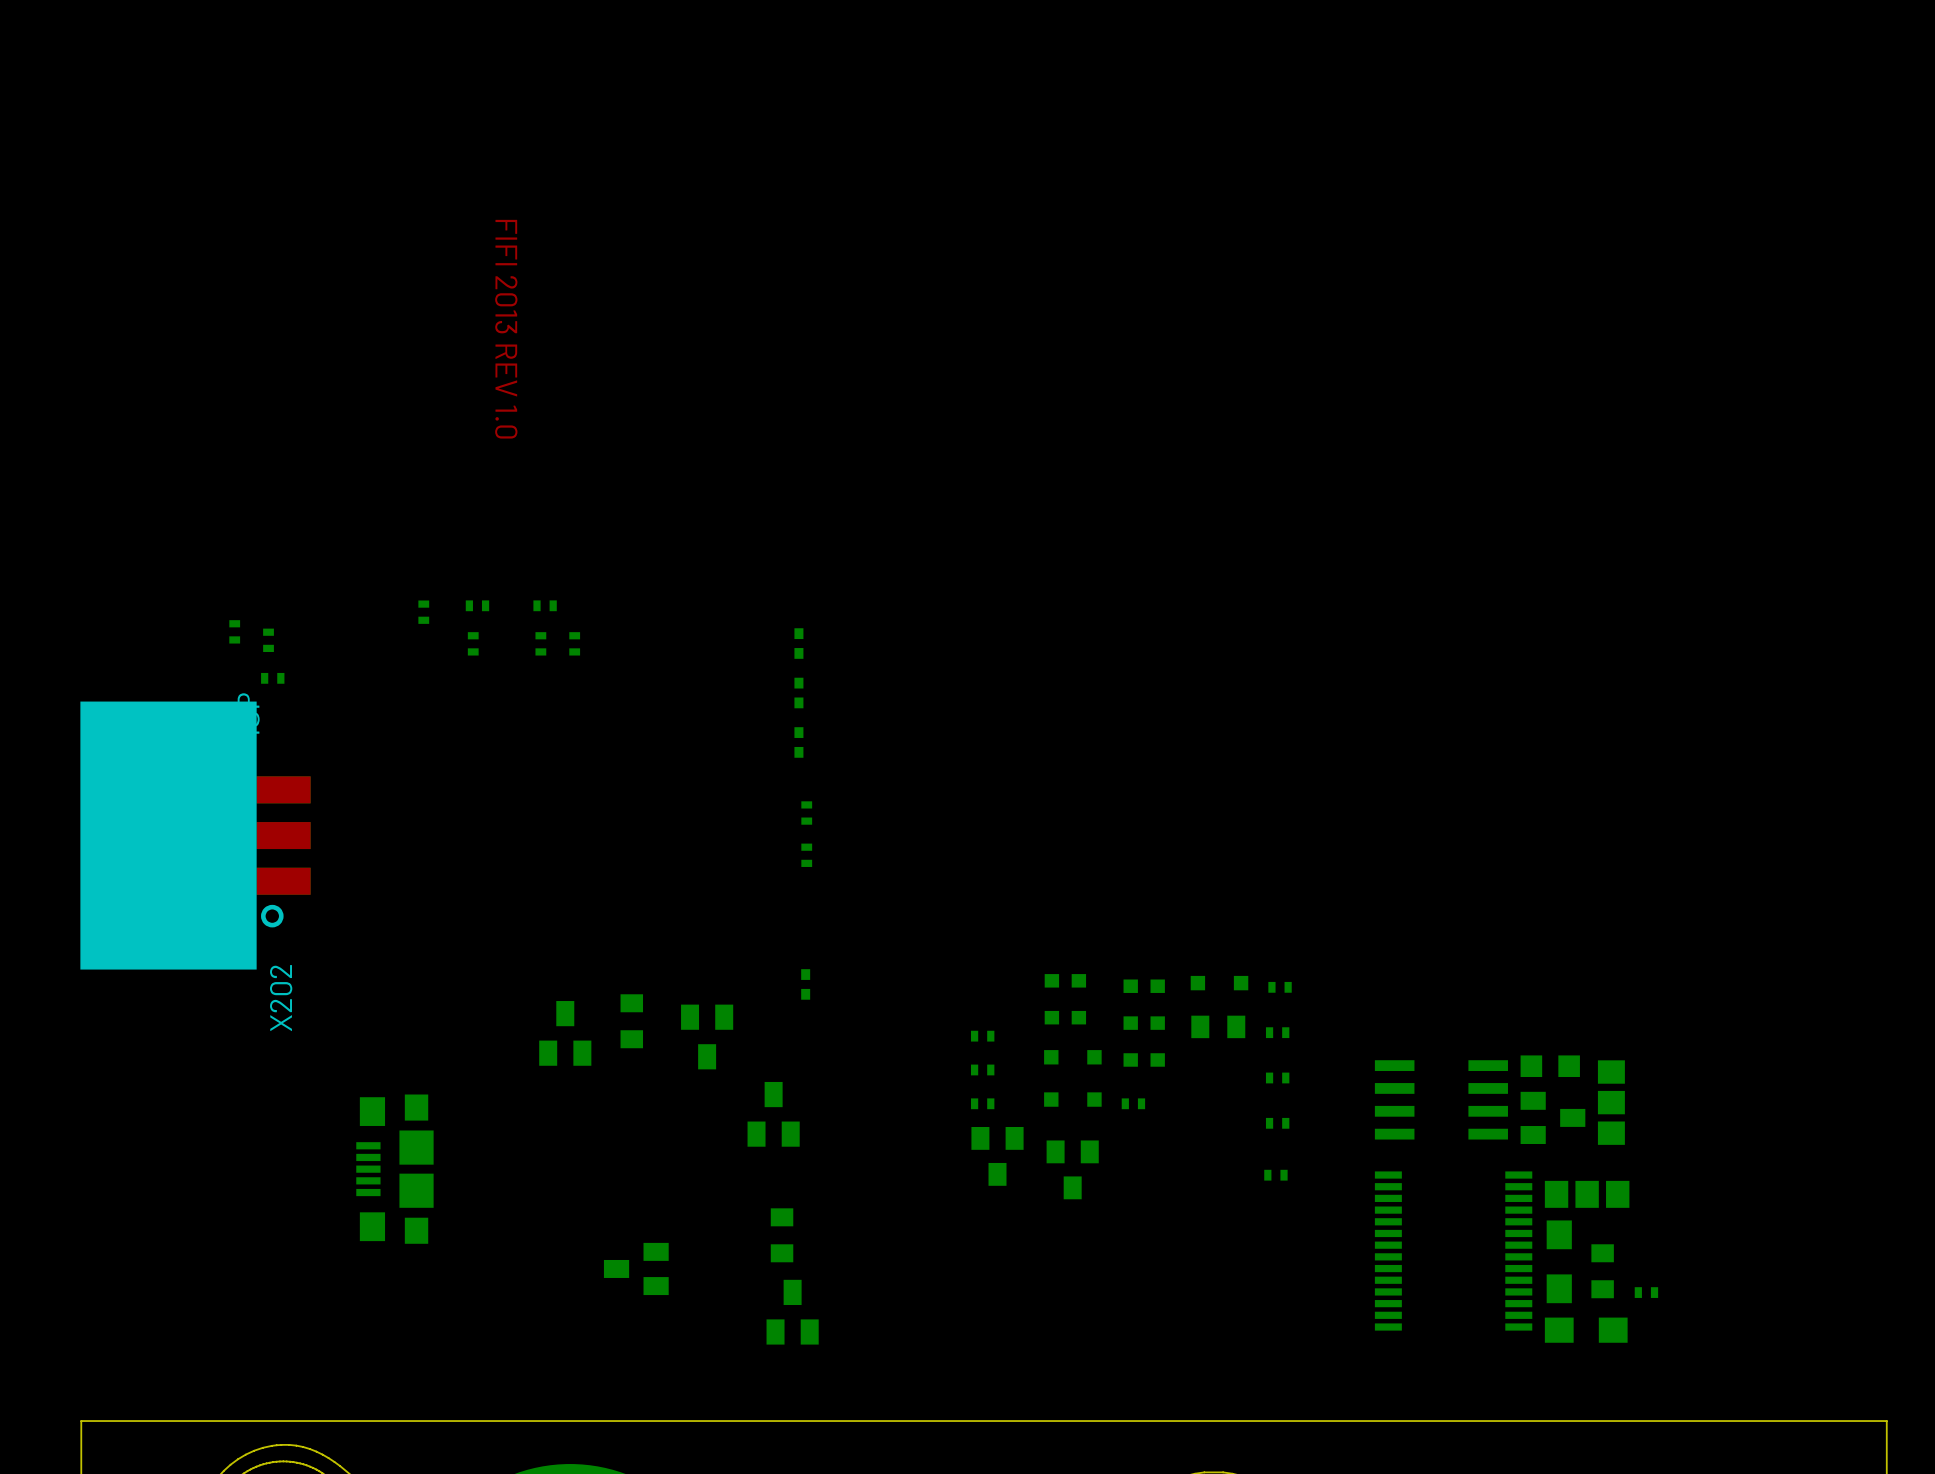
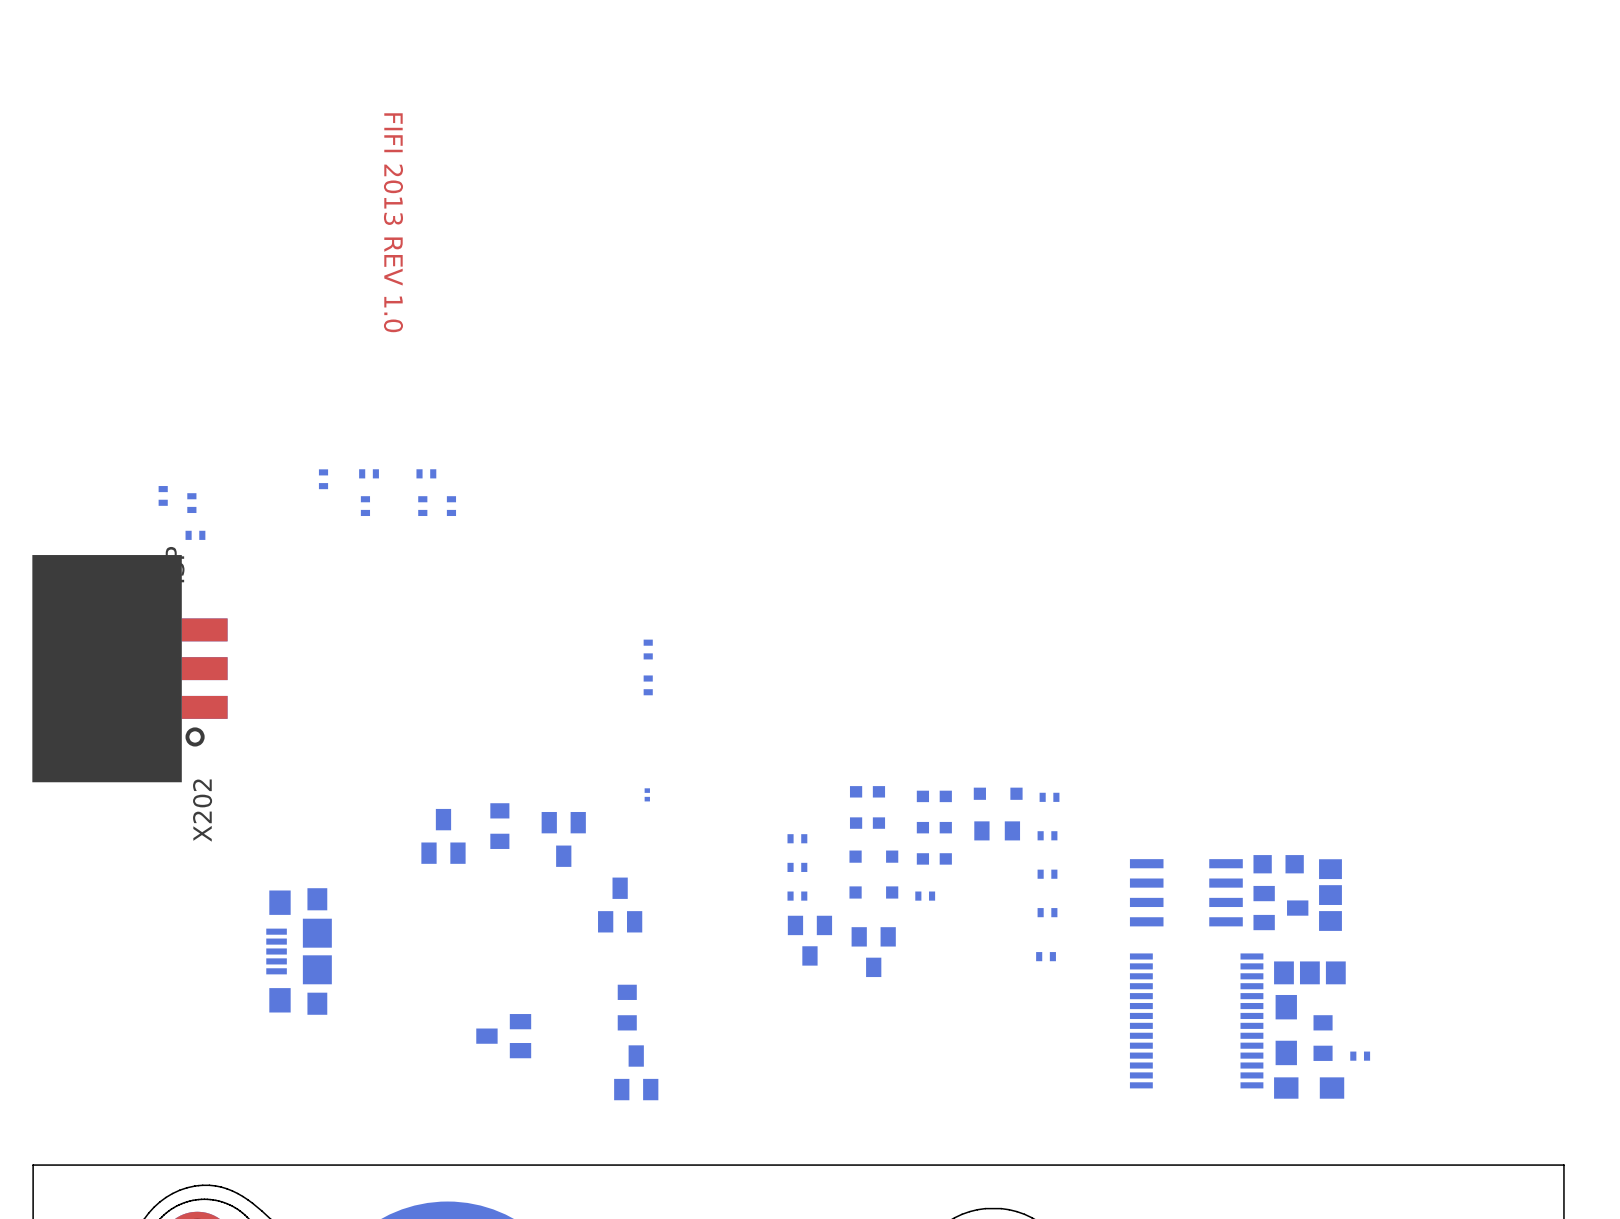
part: (798, 643) -> none
part: (798, 693) -> none
part: (798, 742) -> none
part footprint: [801, 969, 811, 1000] -> [644, 788, 650, 802]

